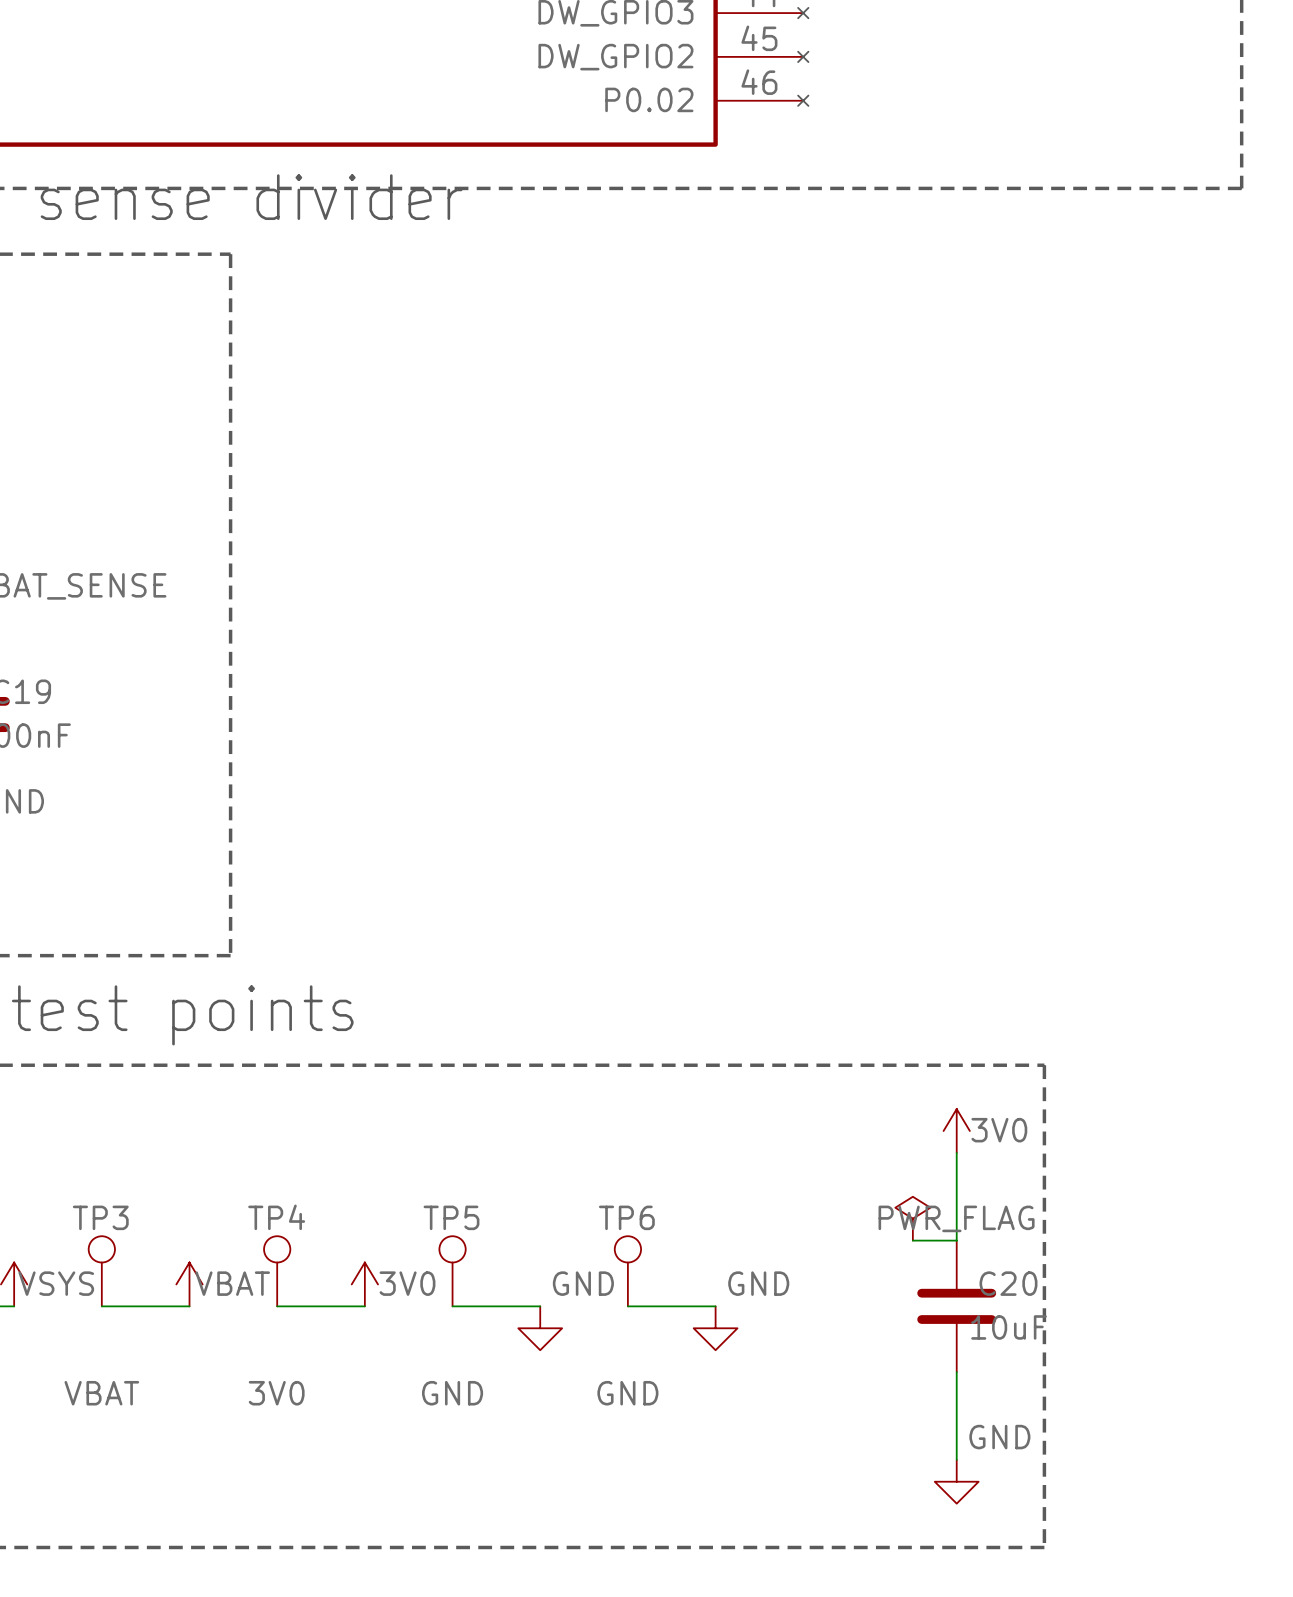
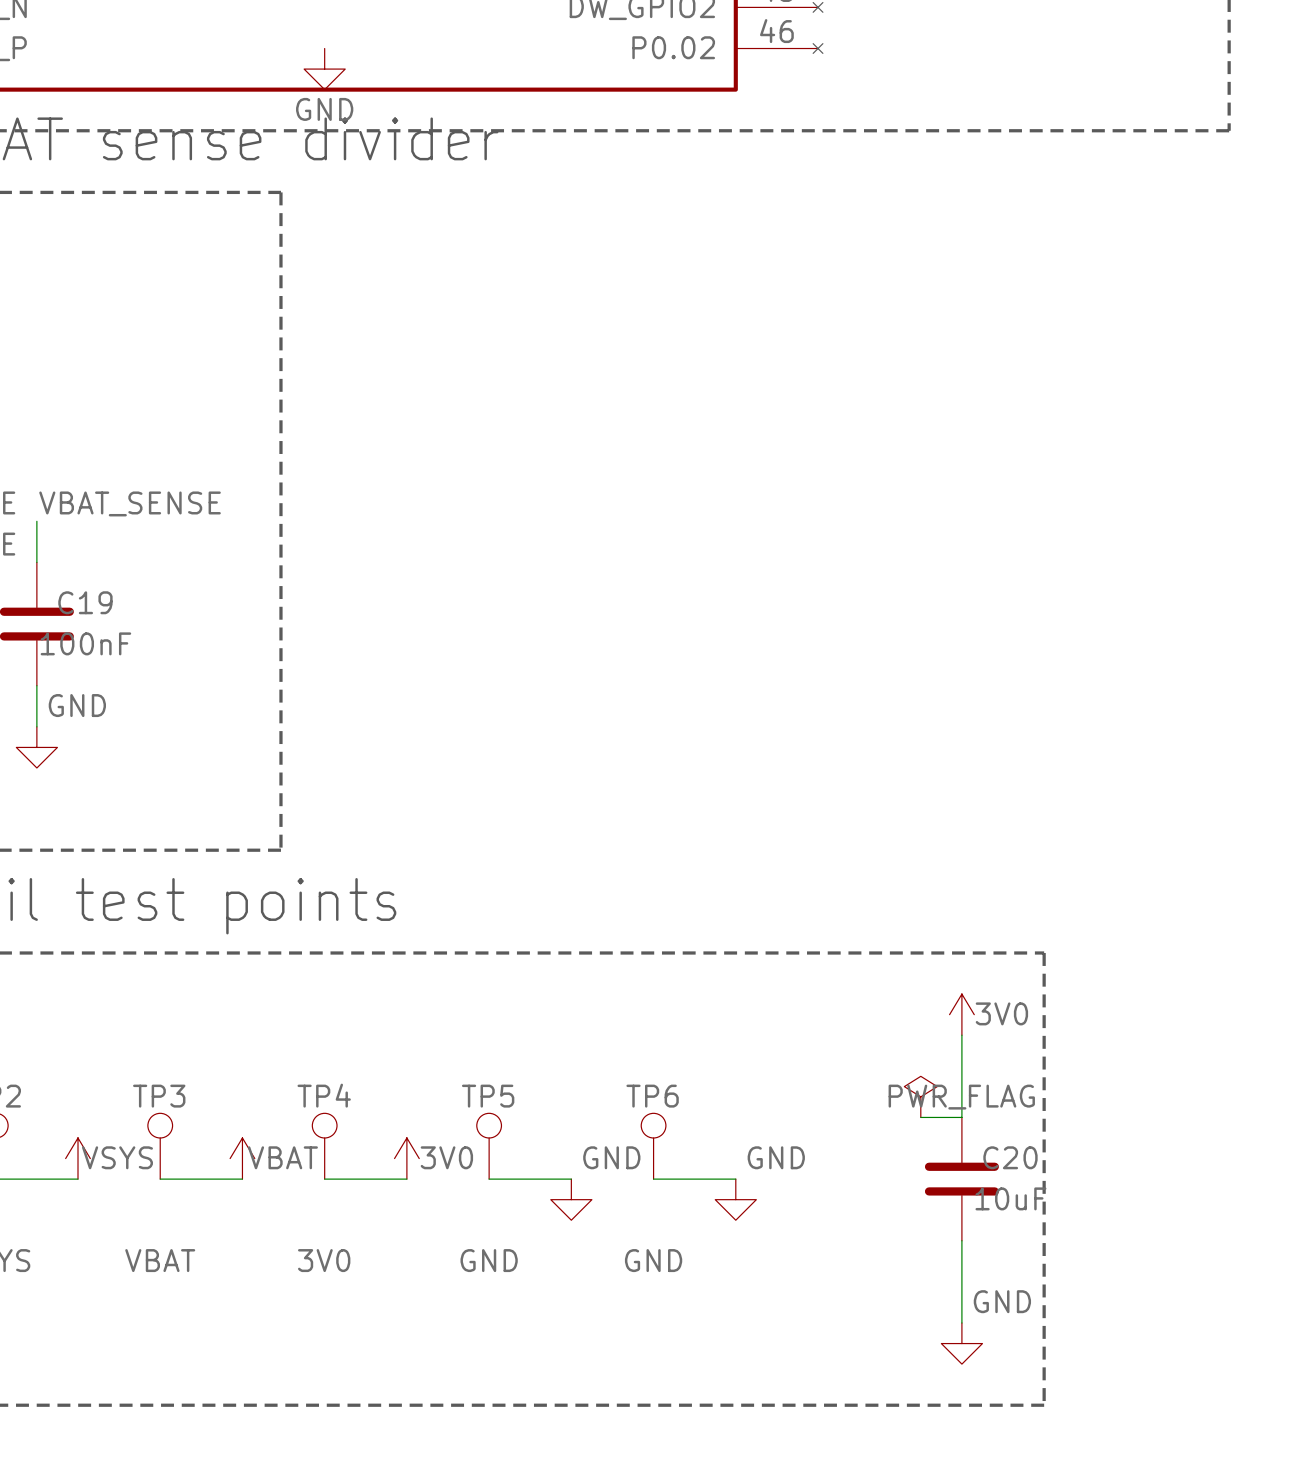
power symbol: none -> GND (324, 69)

